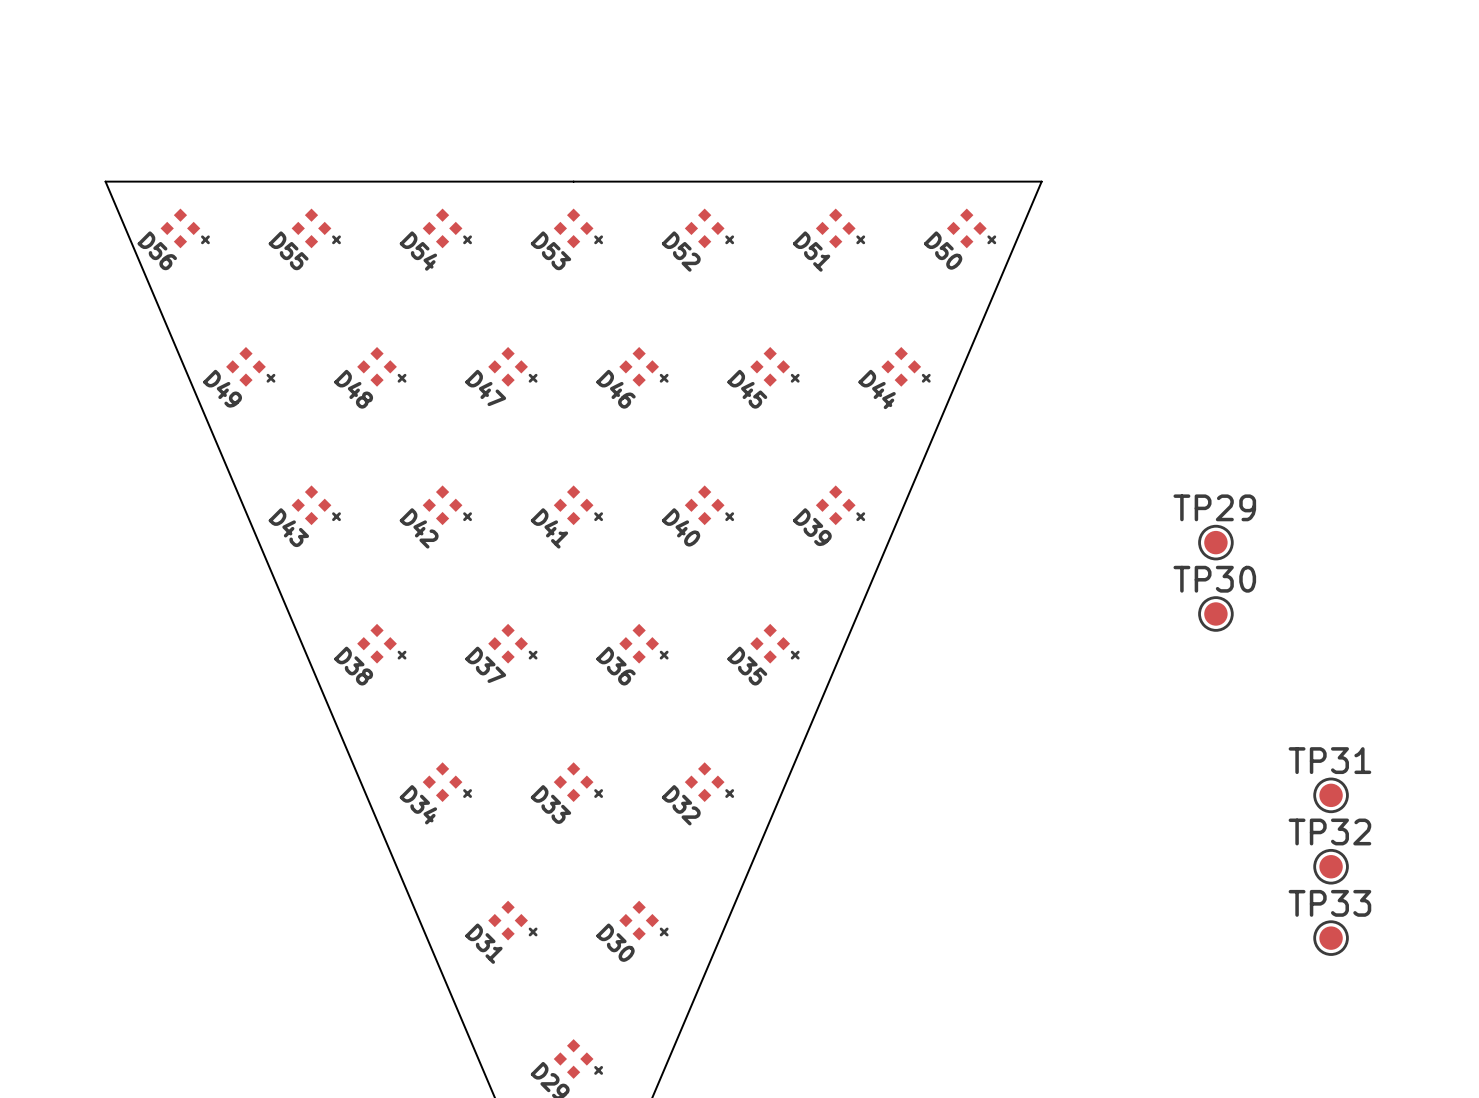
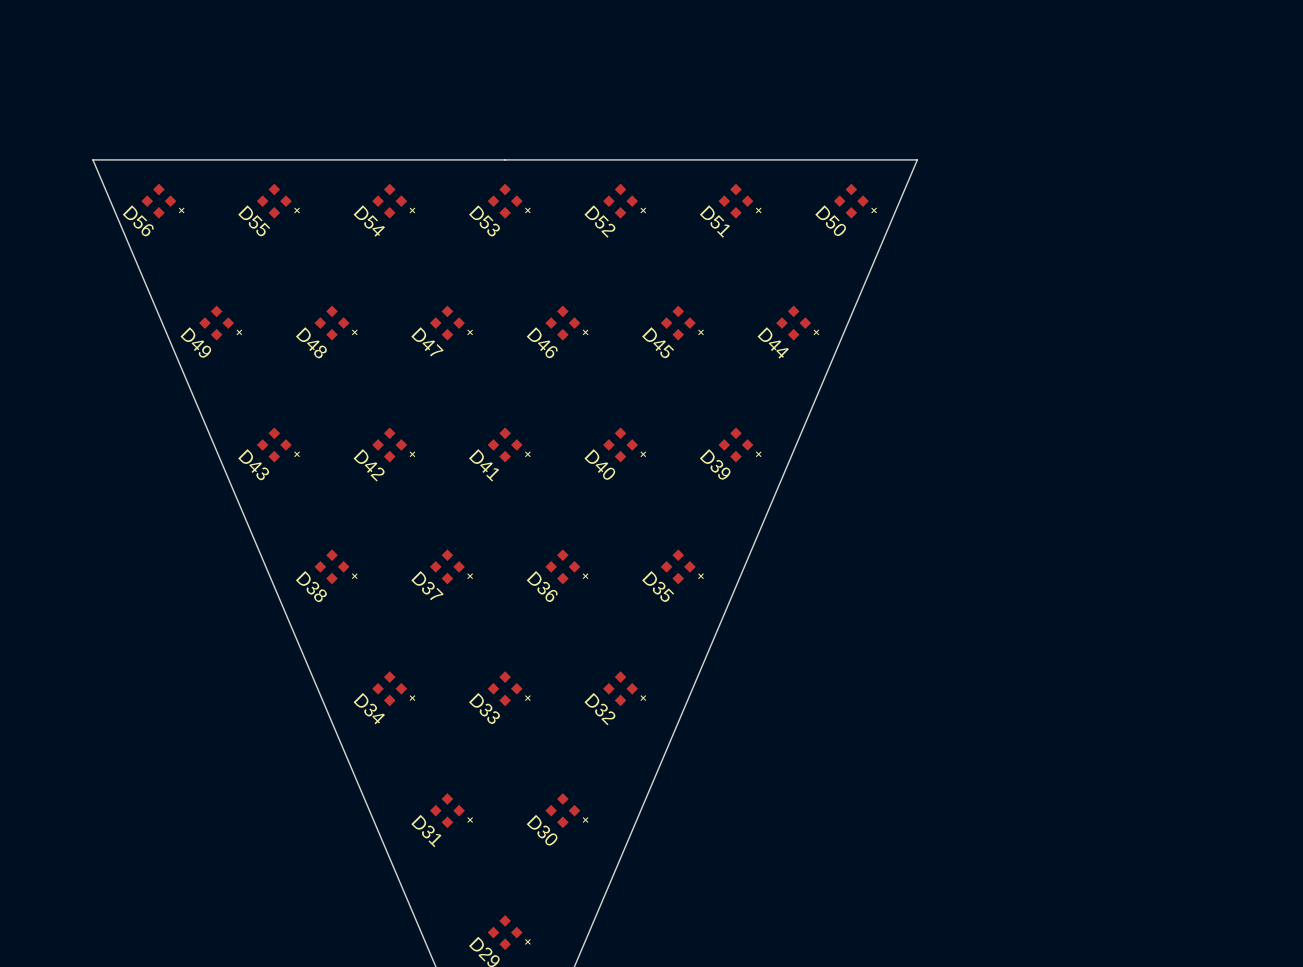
TP29: (1215, 542) -> none
TP30: (1215, 613) -> none
TP31: (1331, 795) -> none
TP32: (1331, 866) -> none
TP33: (1331, 938) -> none

